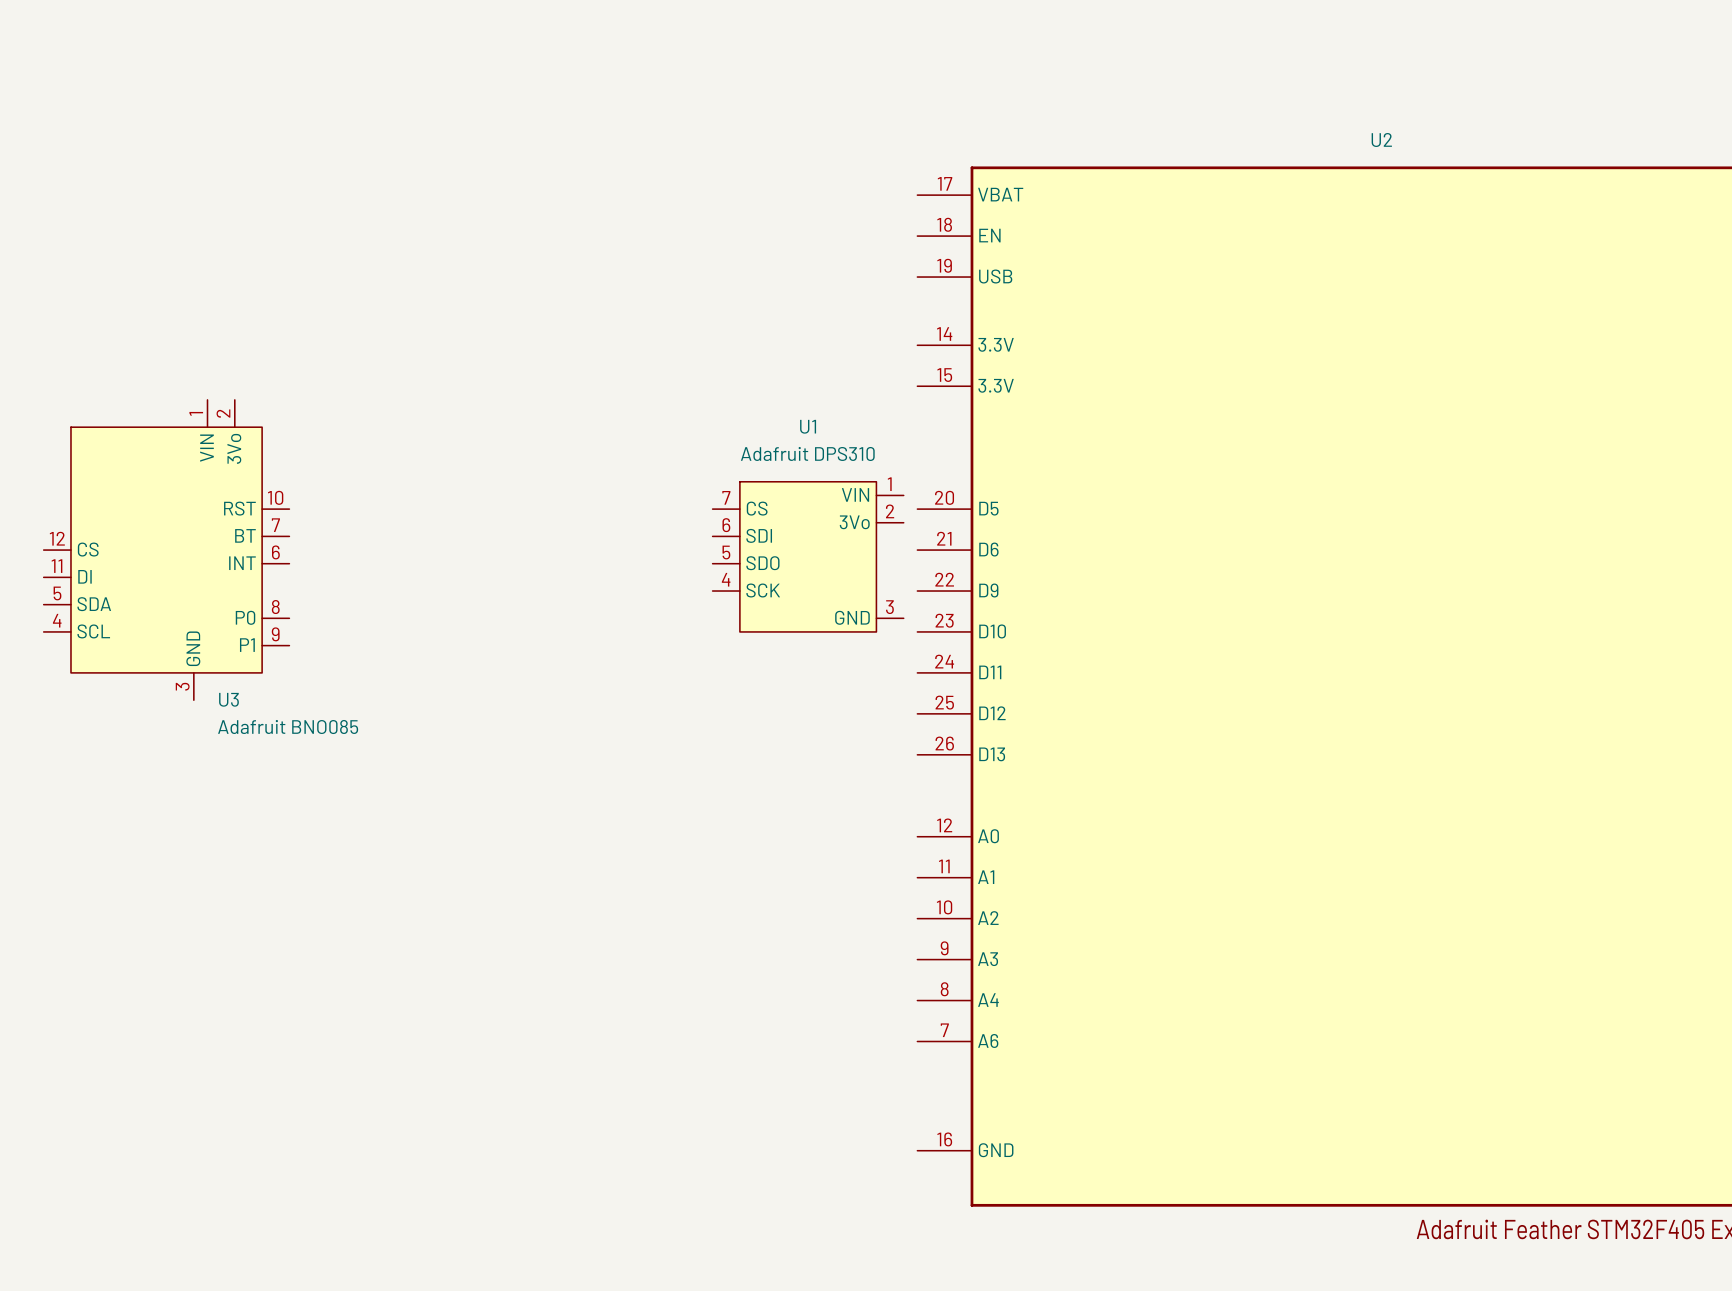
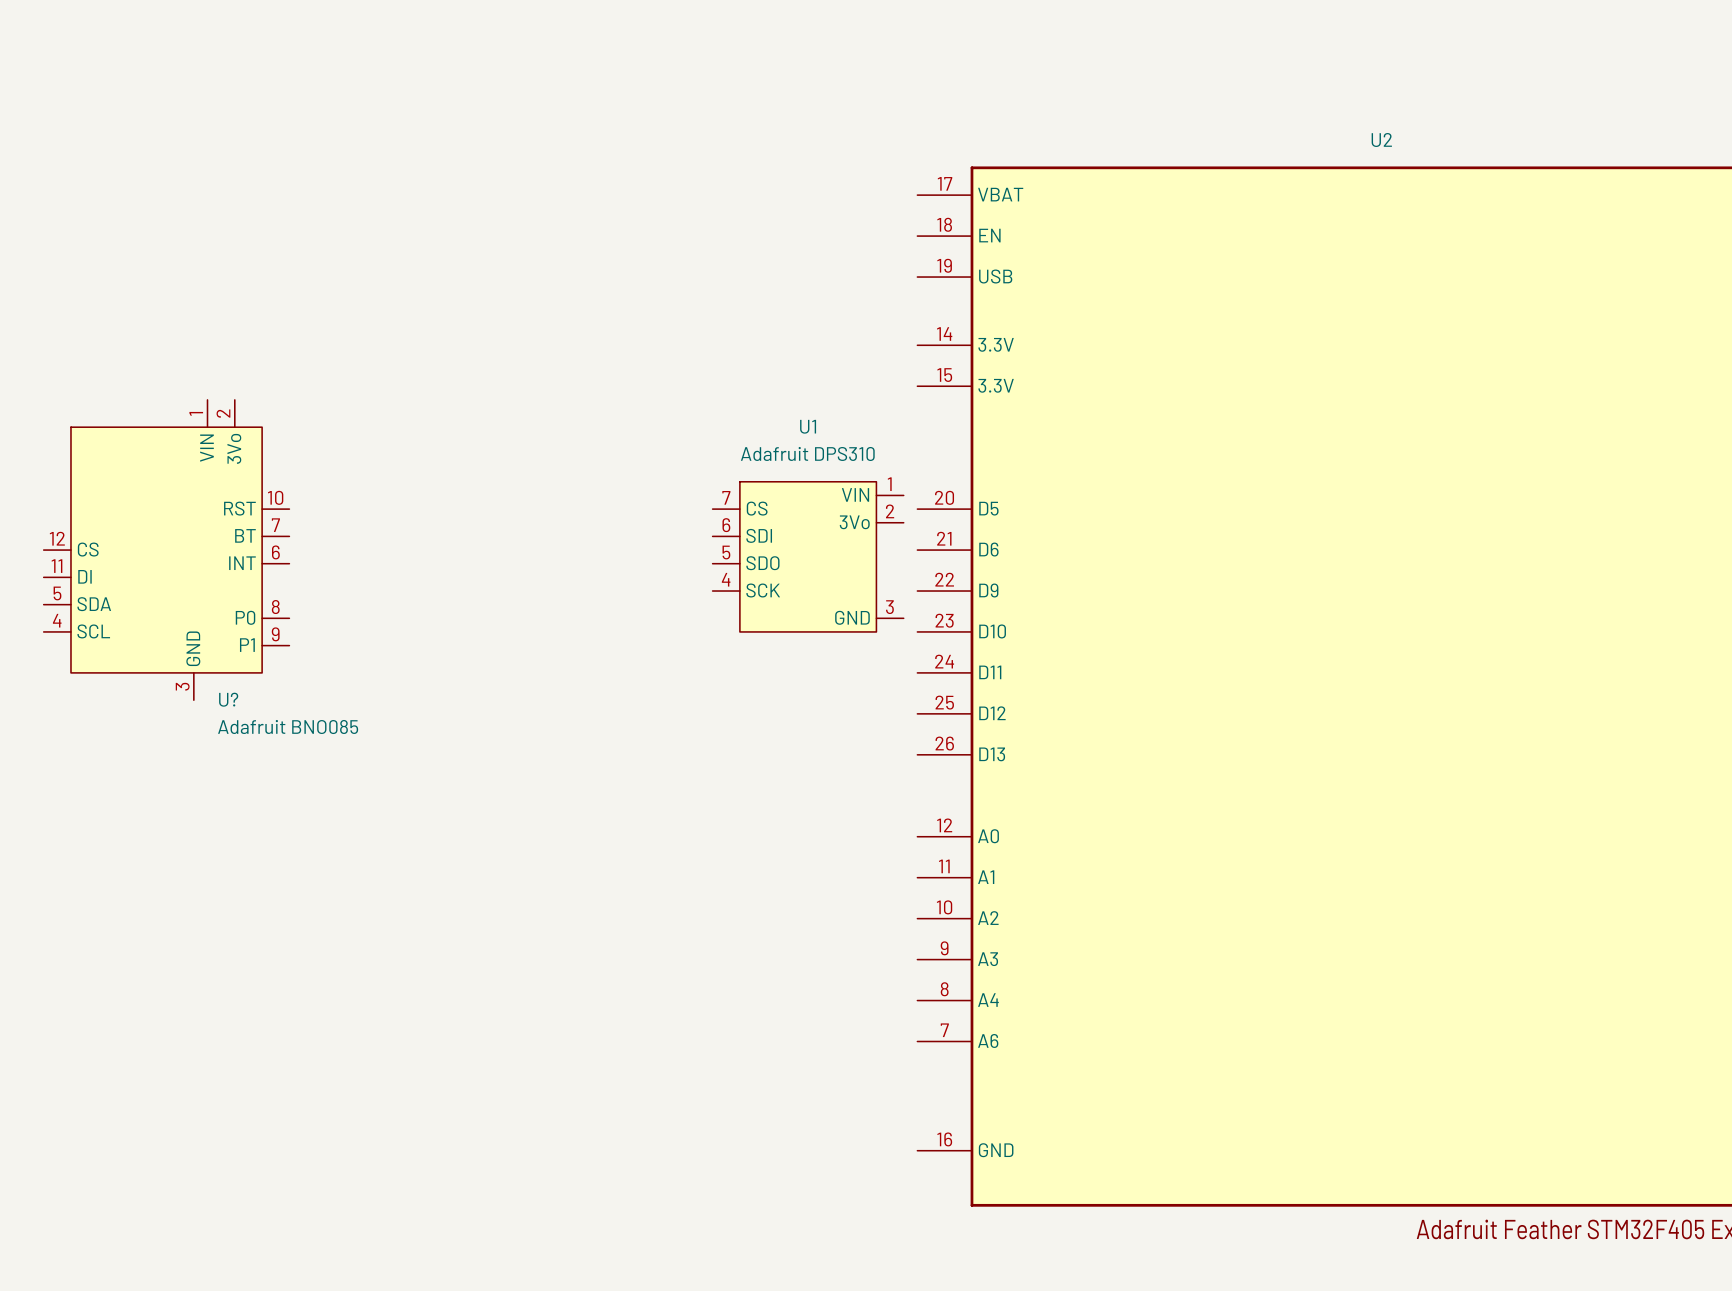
U3 name: U3 (228, 699) -> U? (228, 699)

